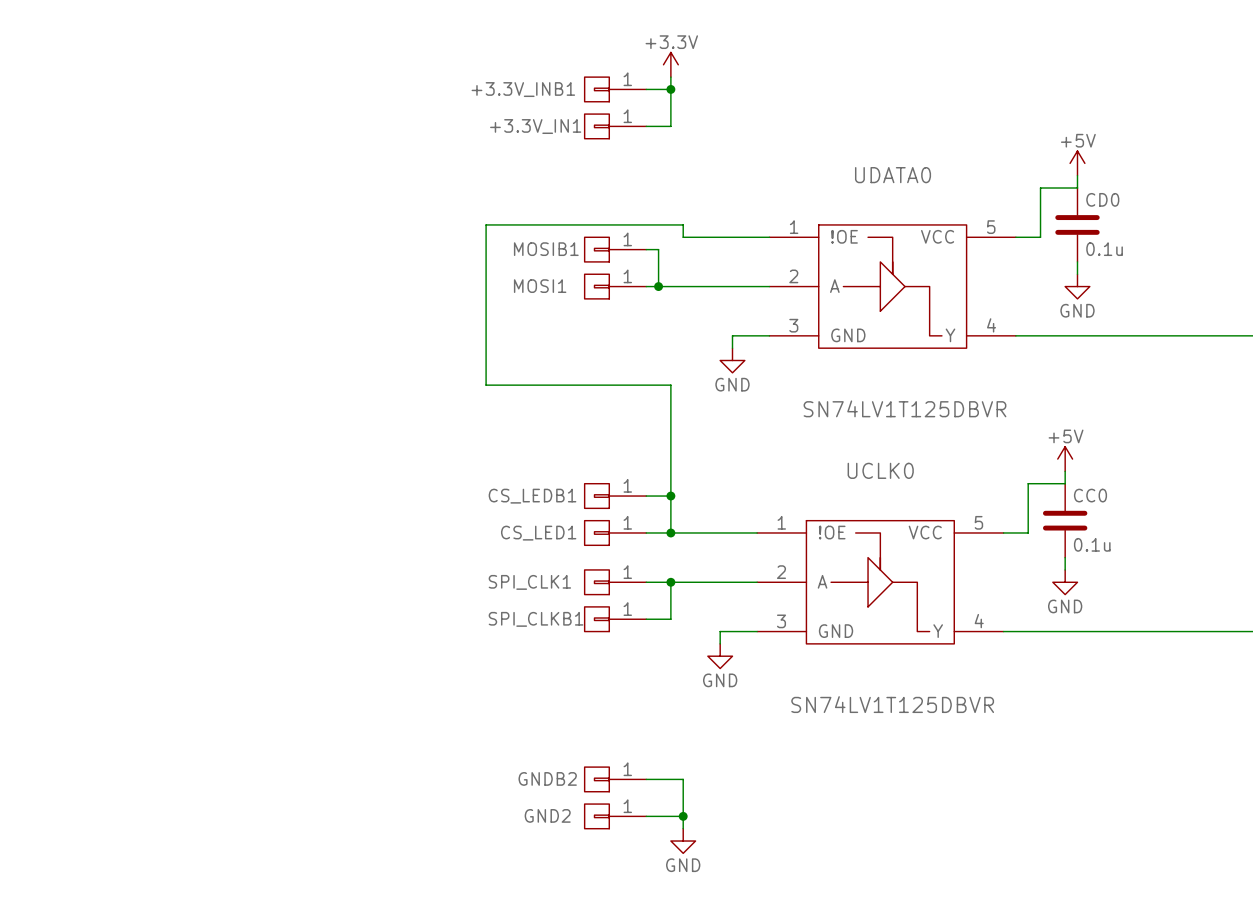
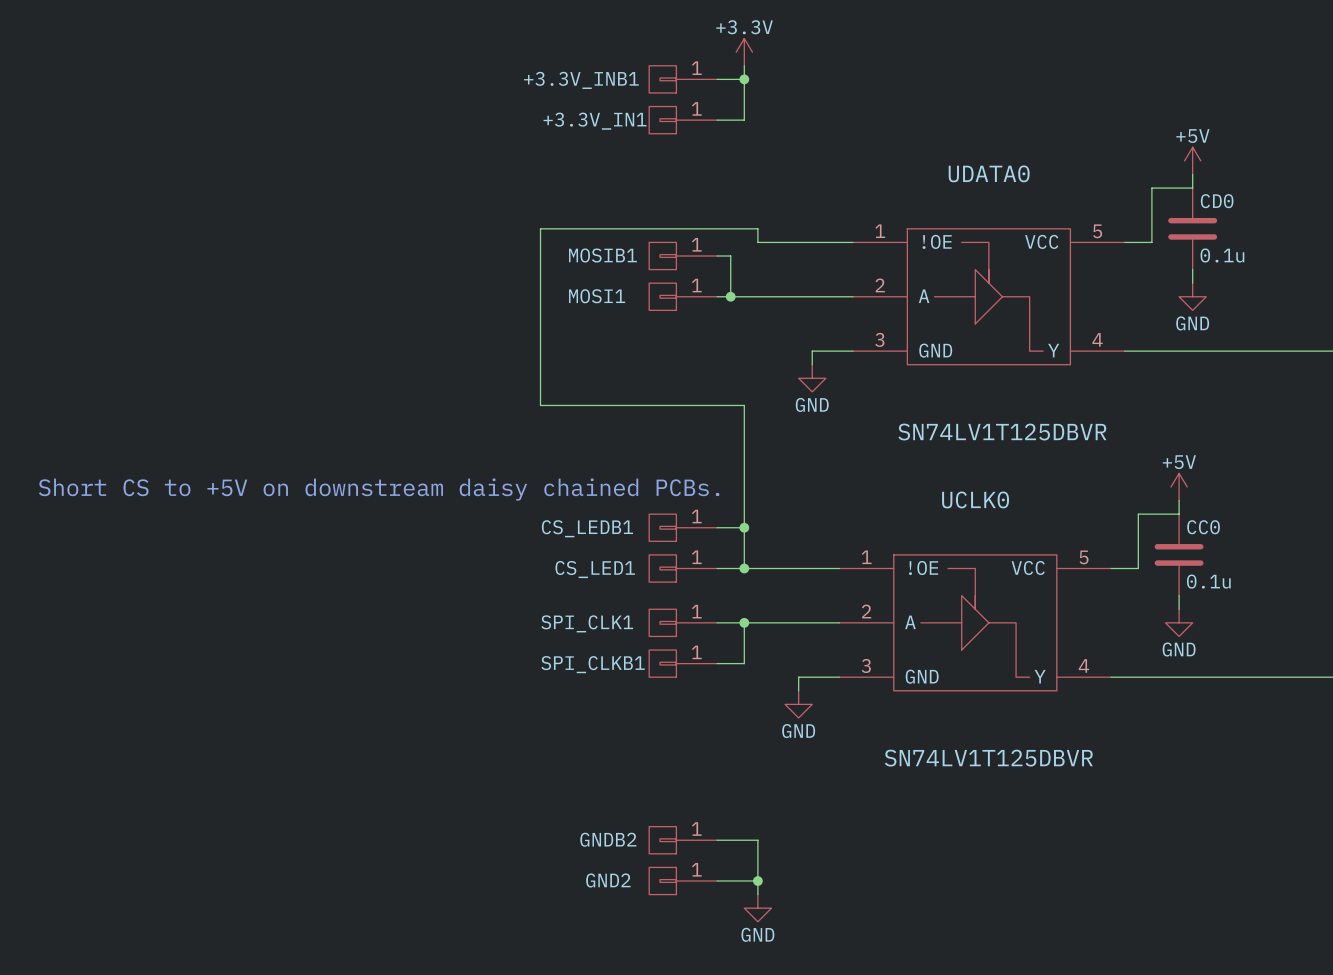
text: none -> Short CS to +5V on downstream daisy chained PCBs. (379, 489)

